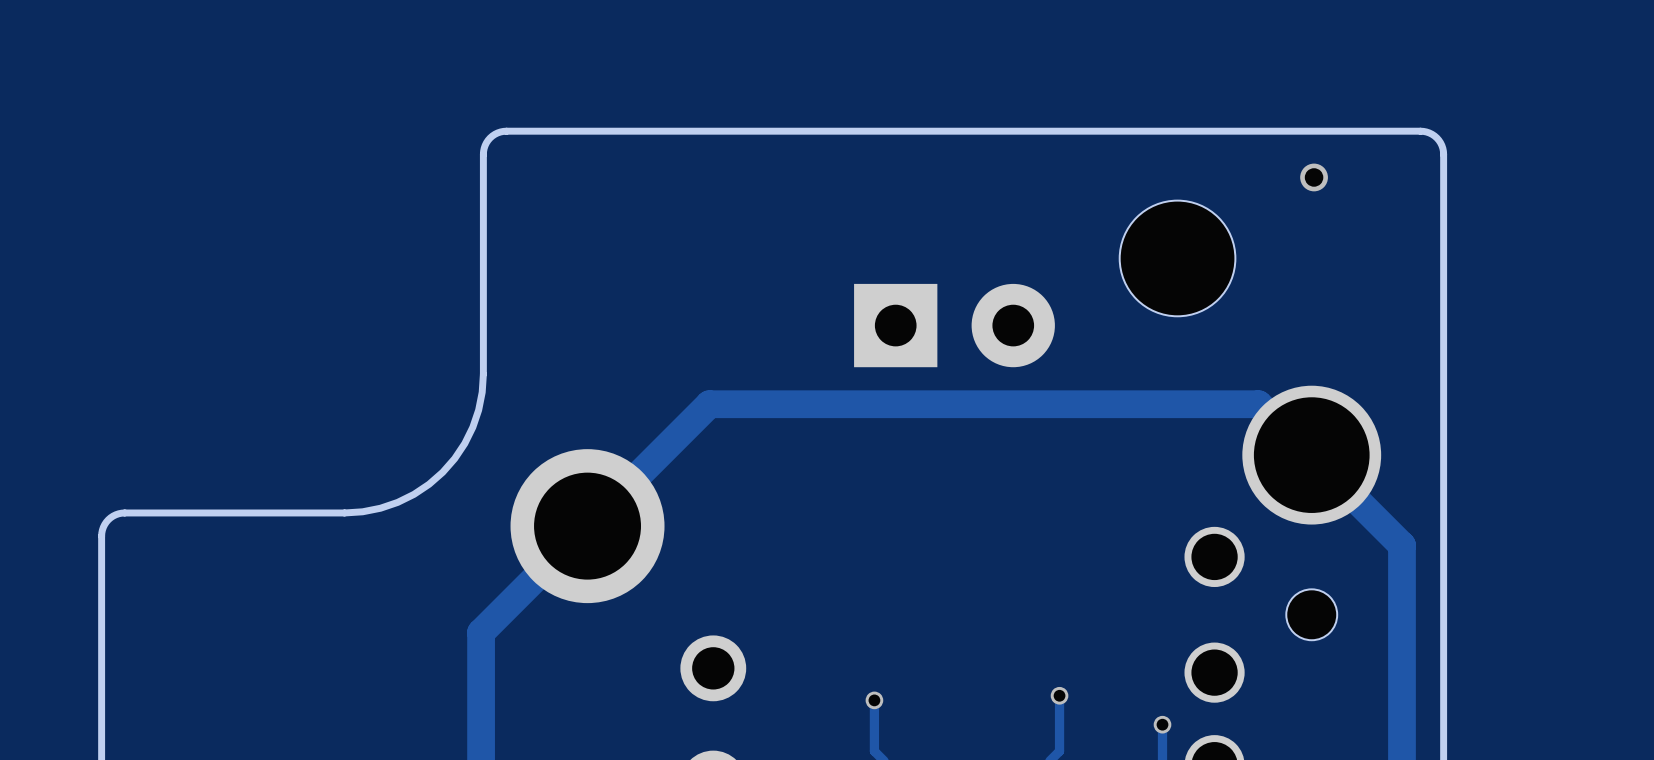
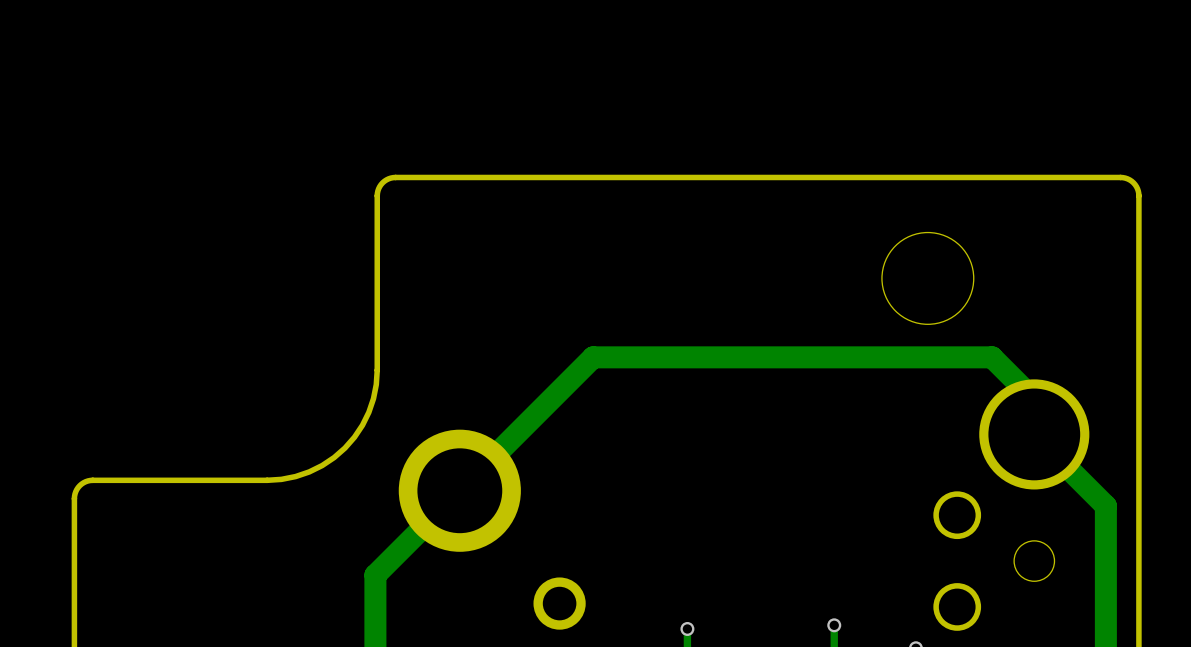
via: (1314, 177) -> none
part: (954, 325) -> none
track: (709, 404) (1258, 404) (1309, 455) (1311, 455) -> (556, 394) (593, 357) (992, 357) (1034, 399) (1034, 434)

